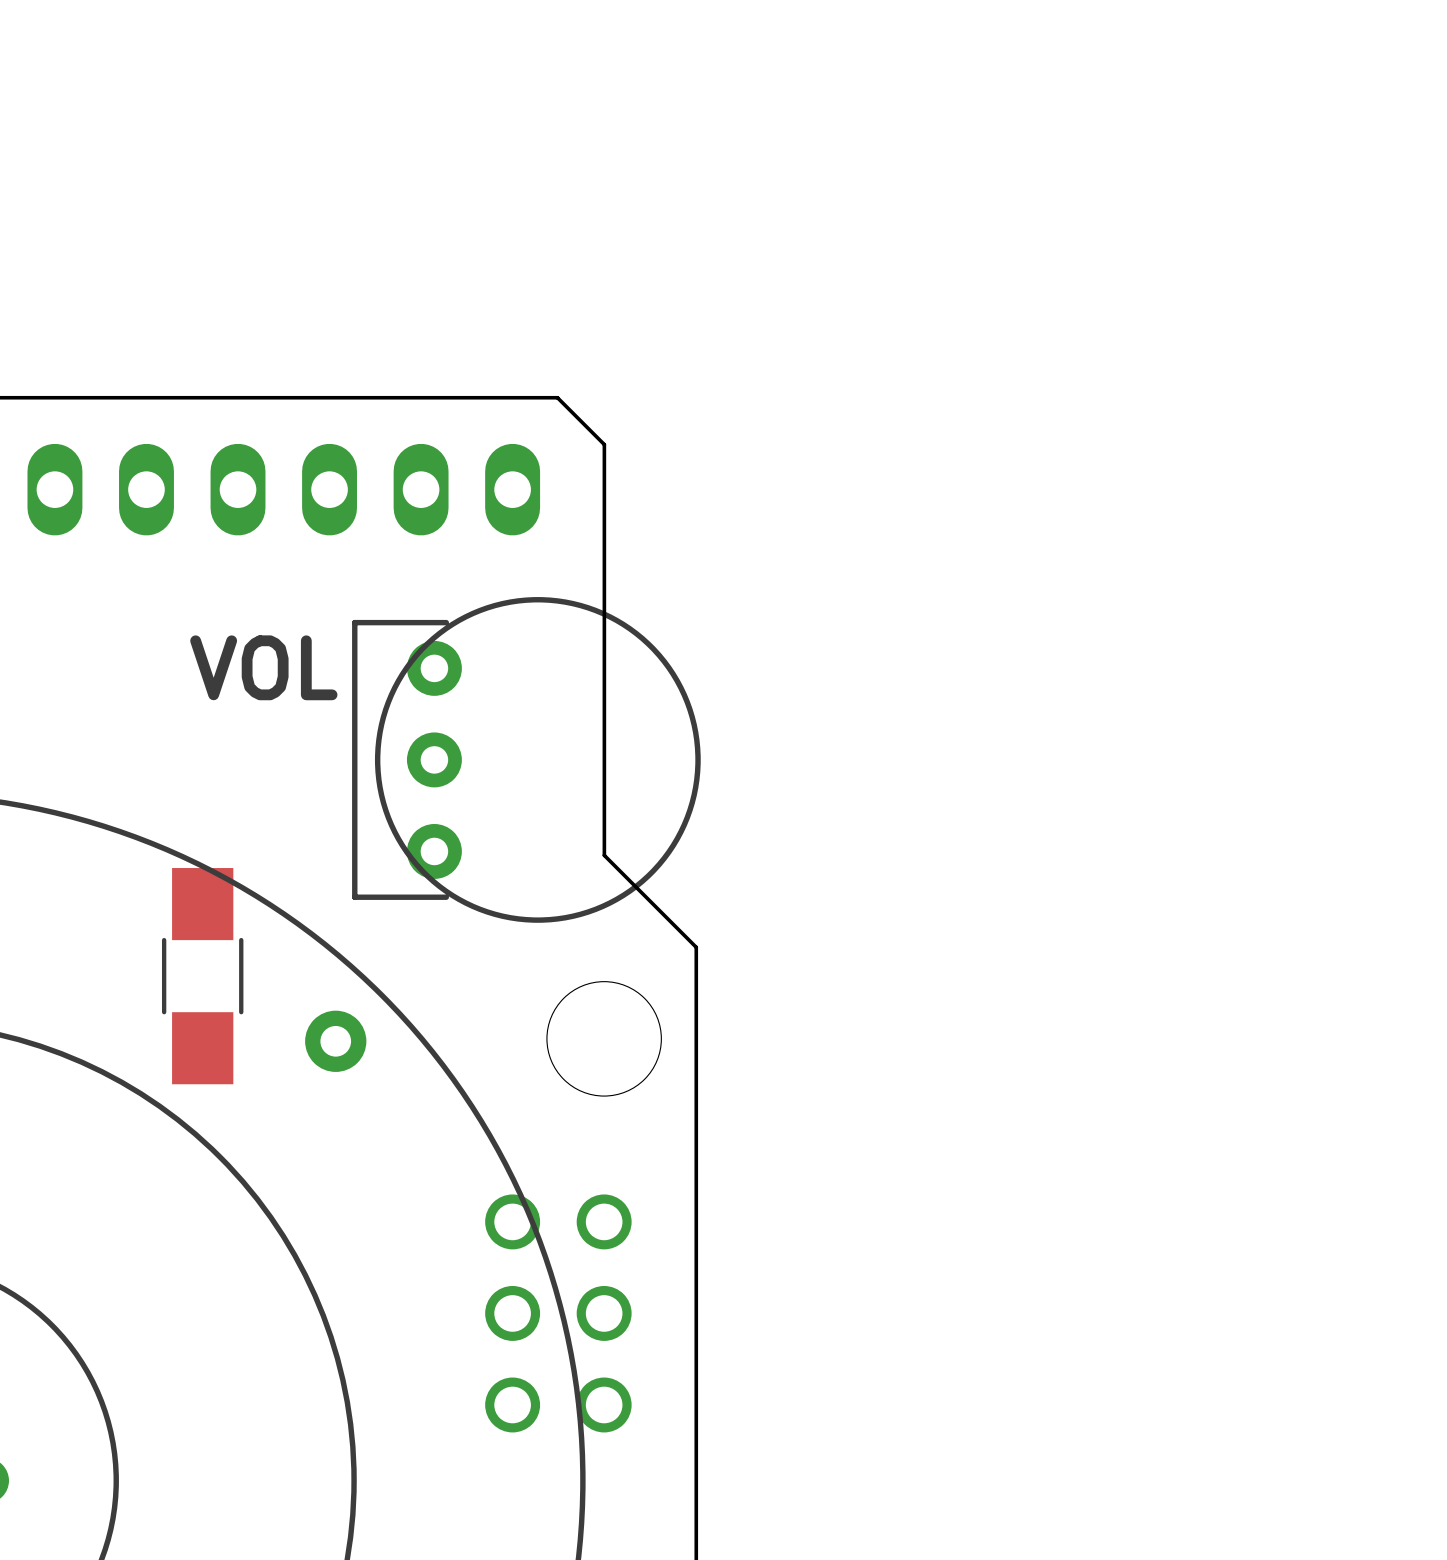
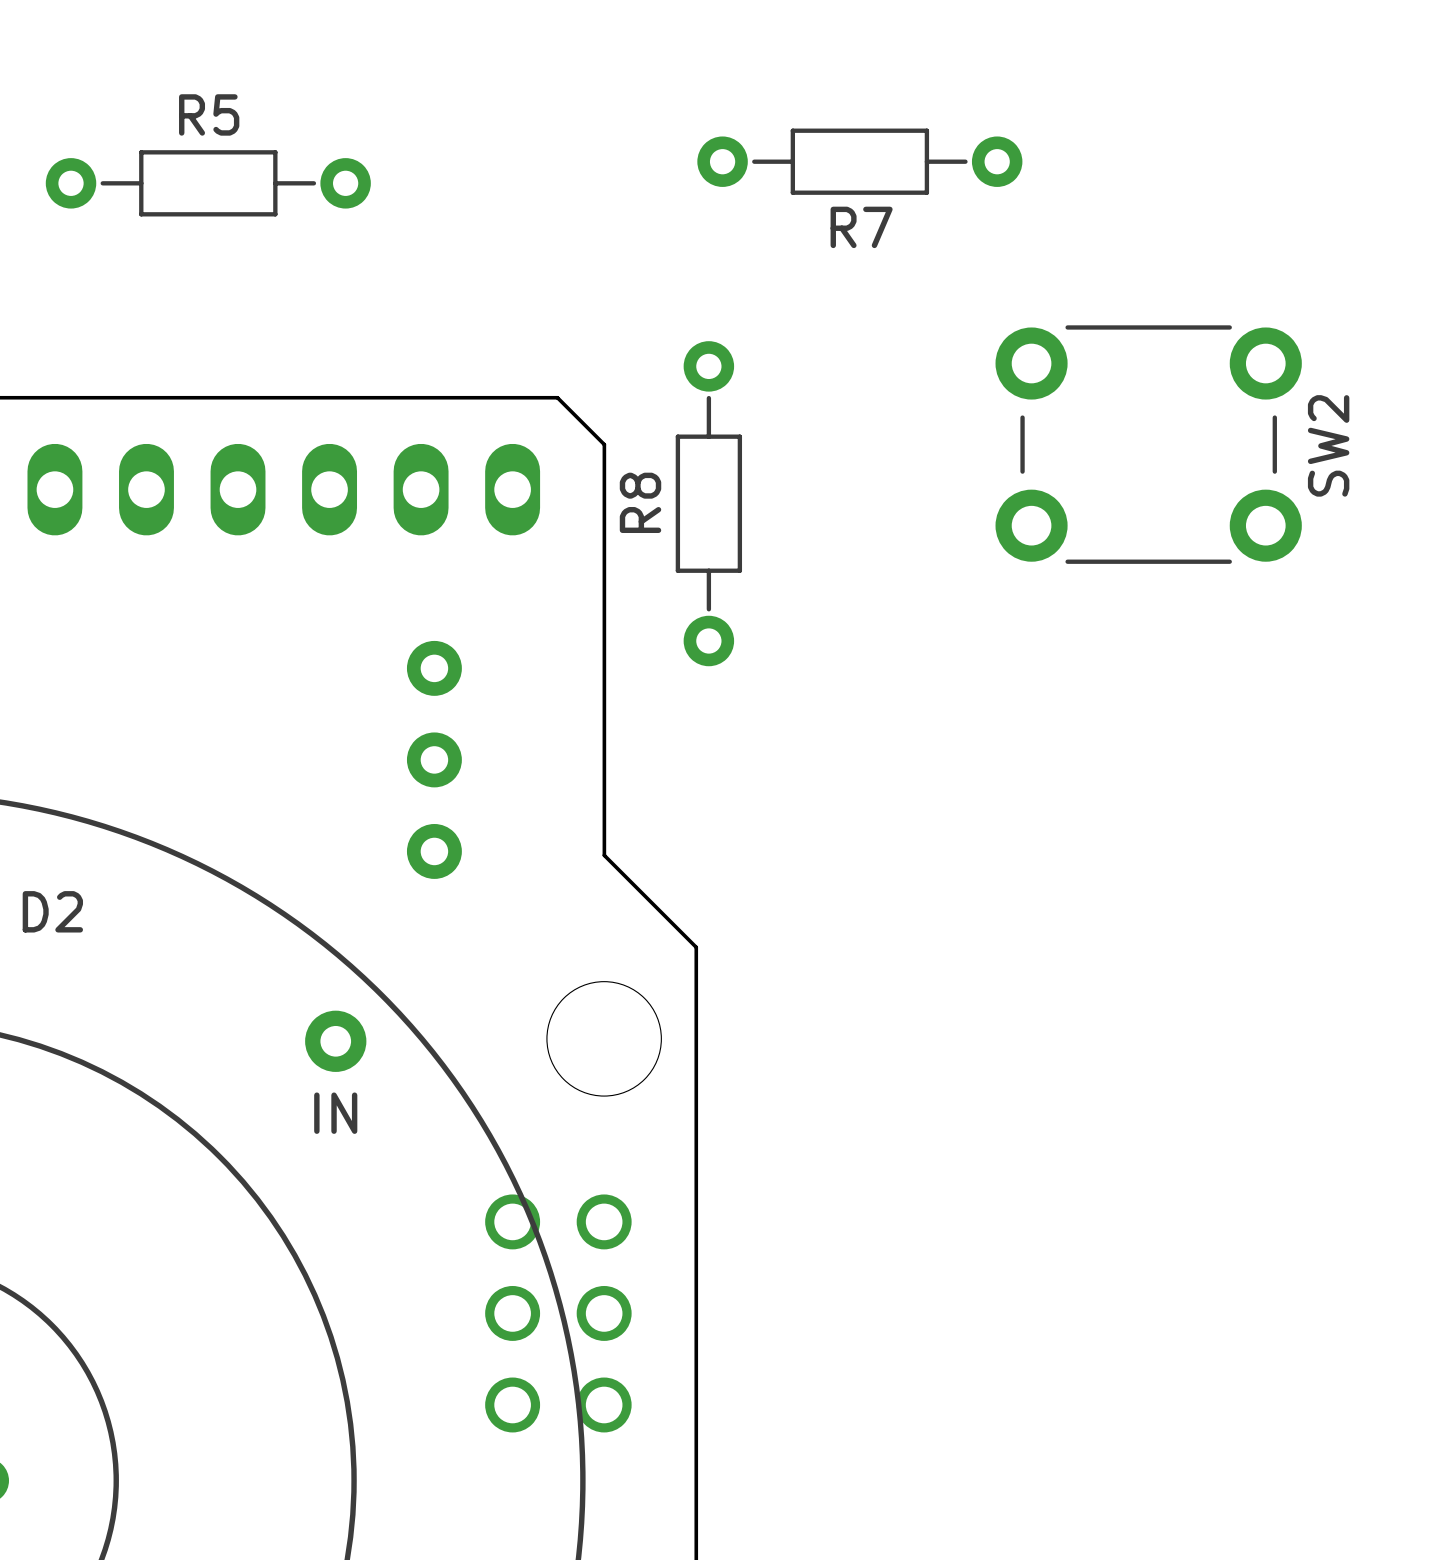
R7: none -> (859, 161)
R5: none -> (208, 183)
SW2: none -> (1148, 444)
R8: none -> (708, 503)
text: VOL (263, 667) -> none
part side: top (526, 759) -> bottom (434, 759)
D2 name: none -> D2 (52, 911)
part: (202, 976) -> none
D2 text: none -> IN (335, 1113)

